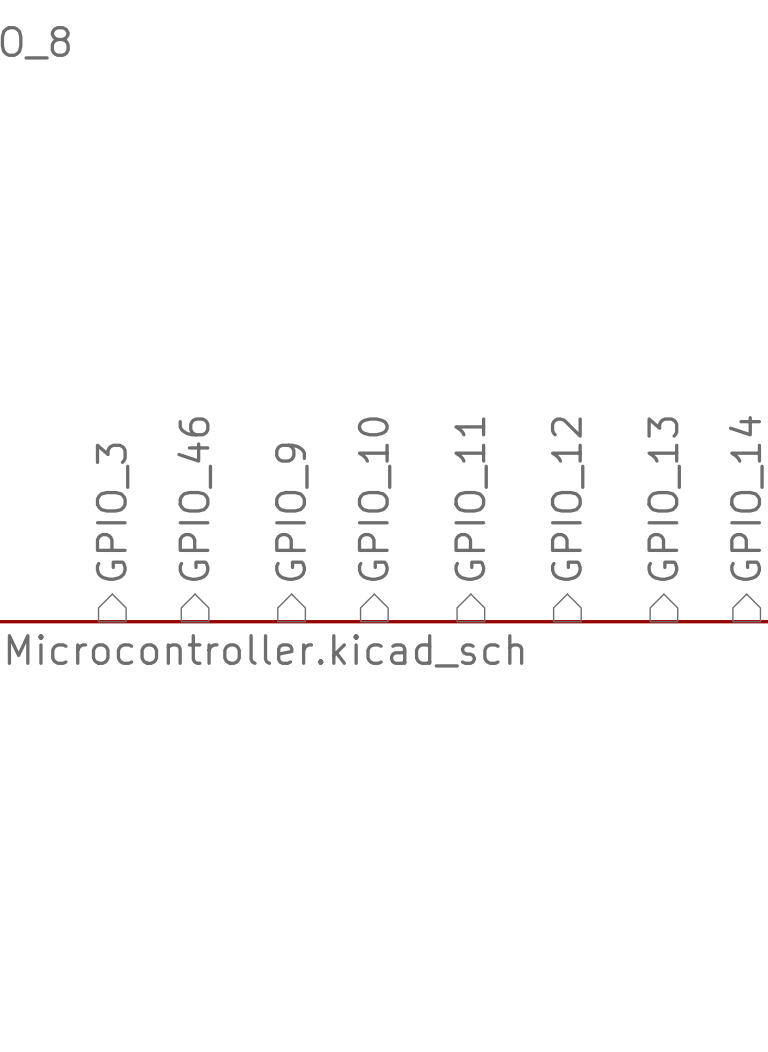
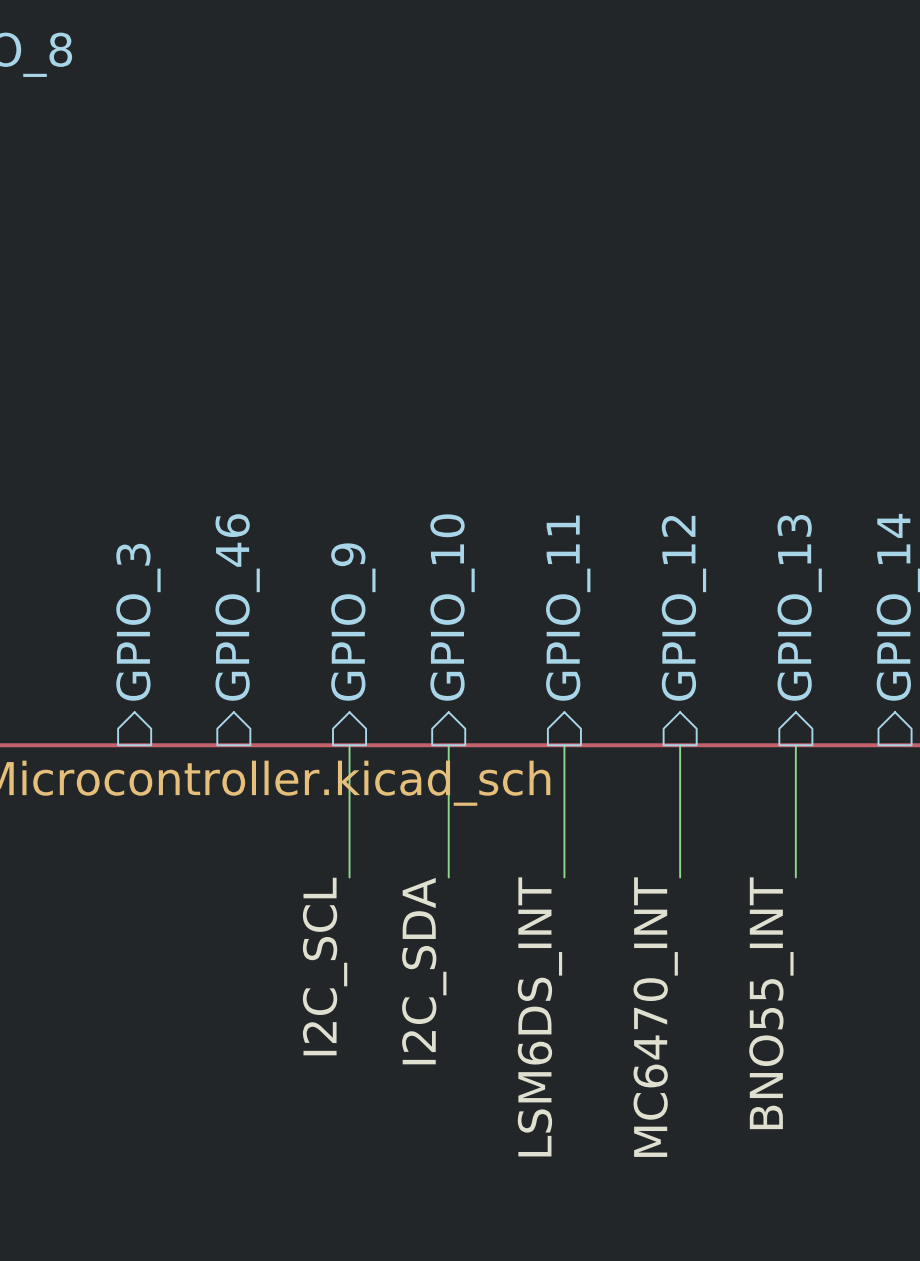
wire: none -> (349, 745) (349, 877)
wire: none -> (448, 745) (448, 877)
wire: none -> (564, 745) (564, 877)
wire: none -> (680, 745) (680, 877)
wire: none -> (795, 745) (795, 877)
label: none -> I2C_SCL (325, 966)
label: none -> I2C_SDA (424, 971)
label: none -> BNO55_INT (771, 1003)
label: none -> LSM6DS_INT (539, 1016)
label: none -> MC6470_INT (655, 1017)

